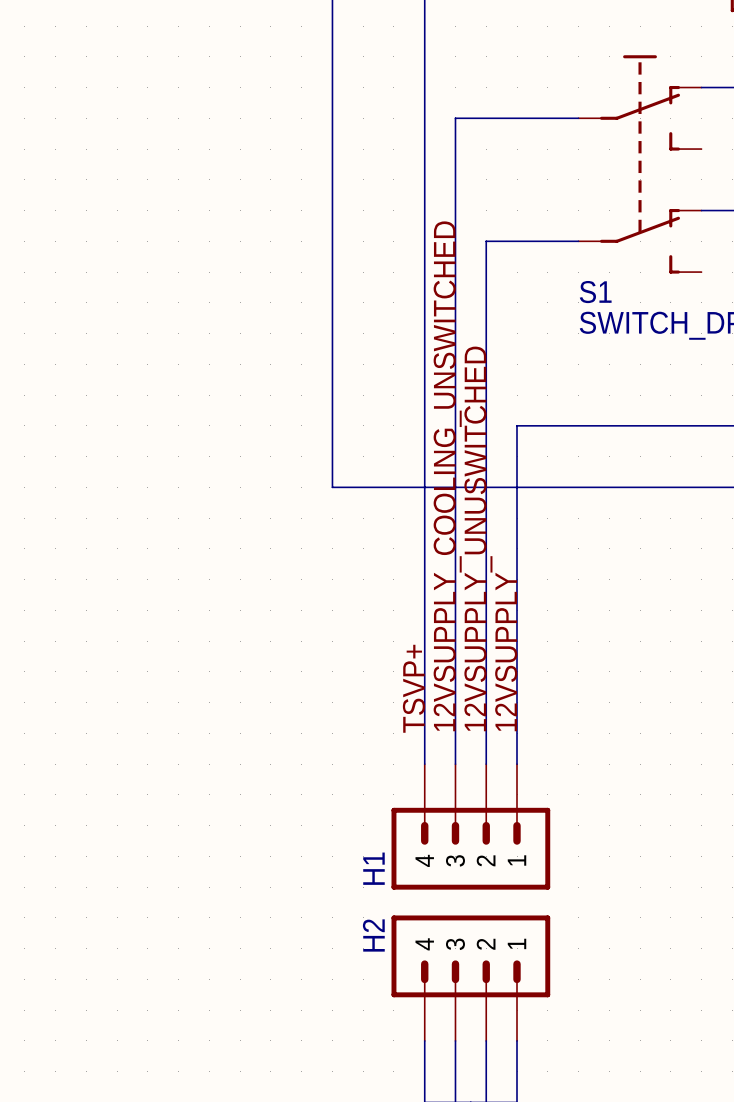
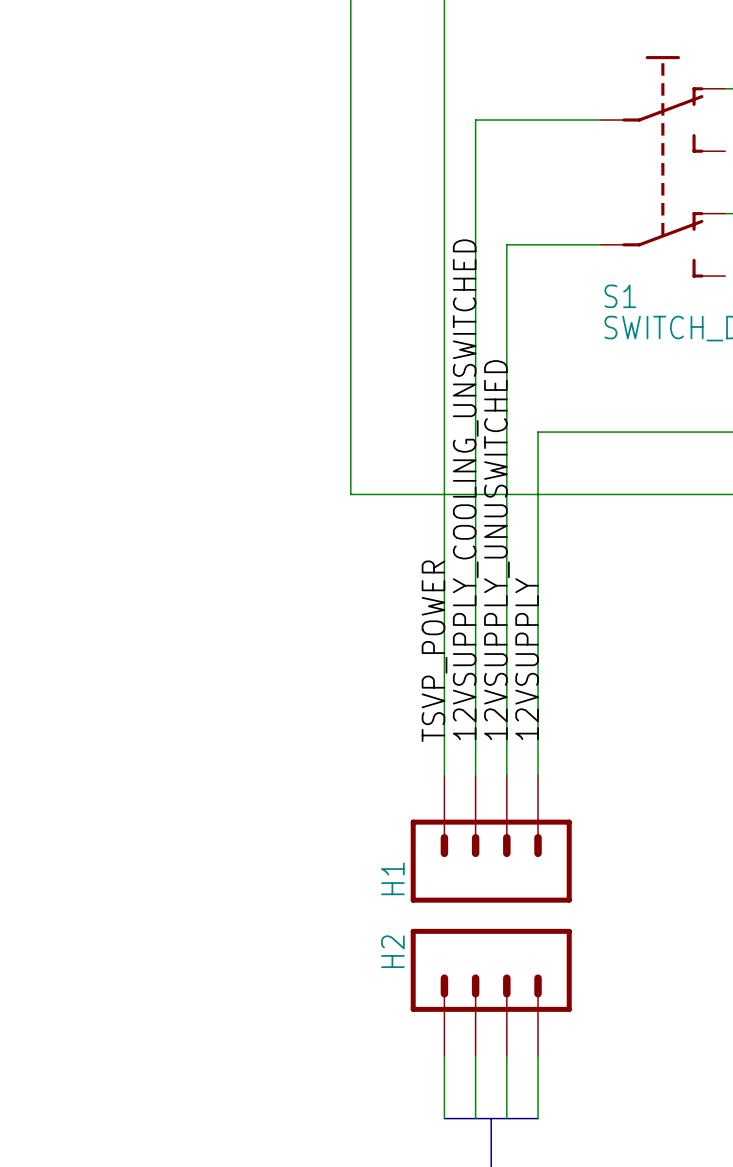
label: TSVP+ (413, 688) -> TSVP_POWER (434, 651)
H1 pin name: 4 (424, 860) -> none
H1 pin name: 3 (455, 860) -> none
H1 pin name: 2 (486, 860) -> none
H1 pin name: 1 (517, 860) -> none
H2 pin name: 1 (517, 943) -> none
H2 pin name: 4 (424, 944) -> none
H2 pin name: 3 (455, 944) -> none
H2 pin name: 2 (486, 944) -> none

